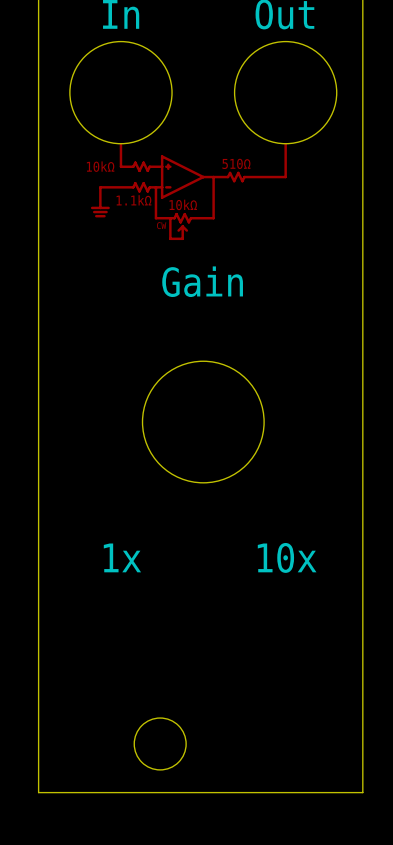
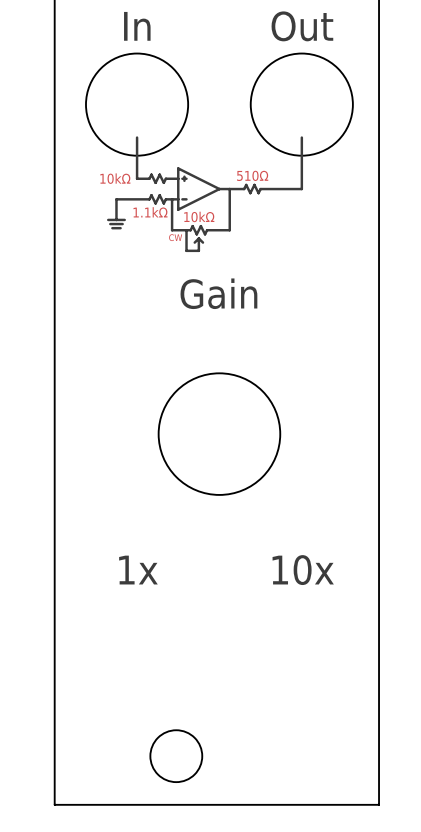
track: (120, 125) (120, 166) (133, 166) (135, 162) (139, 170) (143, 162) (147, 170) (149, 166) (162, 166) -> none
line: none -> (137, 137) (137, 178) (149, 178) (151, 174) (155, 182) (159, 174) (163, 182) (165, 178) (178, 178)
track: (285, 125) (285, 177) (244, 177) (242, 181) (238, 172) (234, 181) (230, 172) (228, 177) (203, 177) -> none
line: none -> (301, 137) (301, 189) (260, 189) (258, 193) (254, 184) (250, 193) (246, 184) (244, 189) (219, 189)
track: (168, 164) (168, 168) -> none
line: none -> (184, 176) (184, 180)
track: (166, 166) (170, 166) -> none
line: none -> (182, 178) (186, 178)
track: (203, 177) (162, 197) (162, 156) (203, 177) -> none
line: none -> (219, 189) (178, 209) (178, 168) (219, 189)
track: (213, 177) (213, 218) (190, 218) (188, 222) (184, 214) (180, 222) (176, 214) (174, 218) (155, 218) (155, 187) -> none
line: none -> (229, 189) (229, 230) (207, 230) (205, 234) (200, 226) (196, 234) (192, 226) (190, 230) (172, 230) (172, 199)
track: (162, 187) (149, 187) (147, 191) (143, 183) (139, 191) (135, 183) (133, 187) (100, 187) (100, 207) -> none
line: none -> (178, 199) (165, 199) (163, 203) (159, 195) (155, 203) (151, 195) (149, 199) (116, 199) (116, 219)
track: (166, 187) (170, 187) -> none
line: none -> (182, 199) (186, 199)
track: (92, 207) (108, 207) -> none
line: none -> (108, 219) (124, 219)
track: (94, 212) (106, 212) -> none
line: none -> (110, 224) (122, 224)
track: (96, 216) (104, 216) -> none
line: none -> (112, 228) (120, 228)
track: (170, 218) (170, 238) (182, 238) (182, 226) -> none
line: none -> (186, 230) (186, 250) (198, 250) (198, 238)
track: (182, 226) (186, 230) -> none
track: (182, 226) (178, 230) -> none
line: none -> (198, 238) (202, 242)
line: none -> (198, 238) (194, 242)

